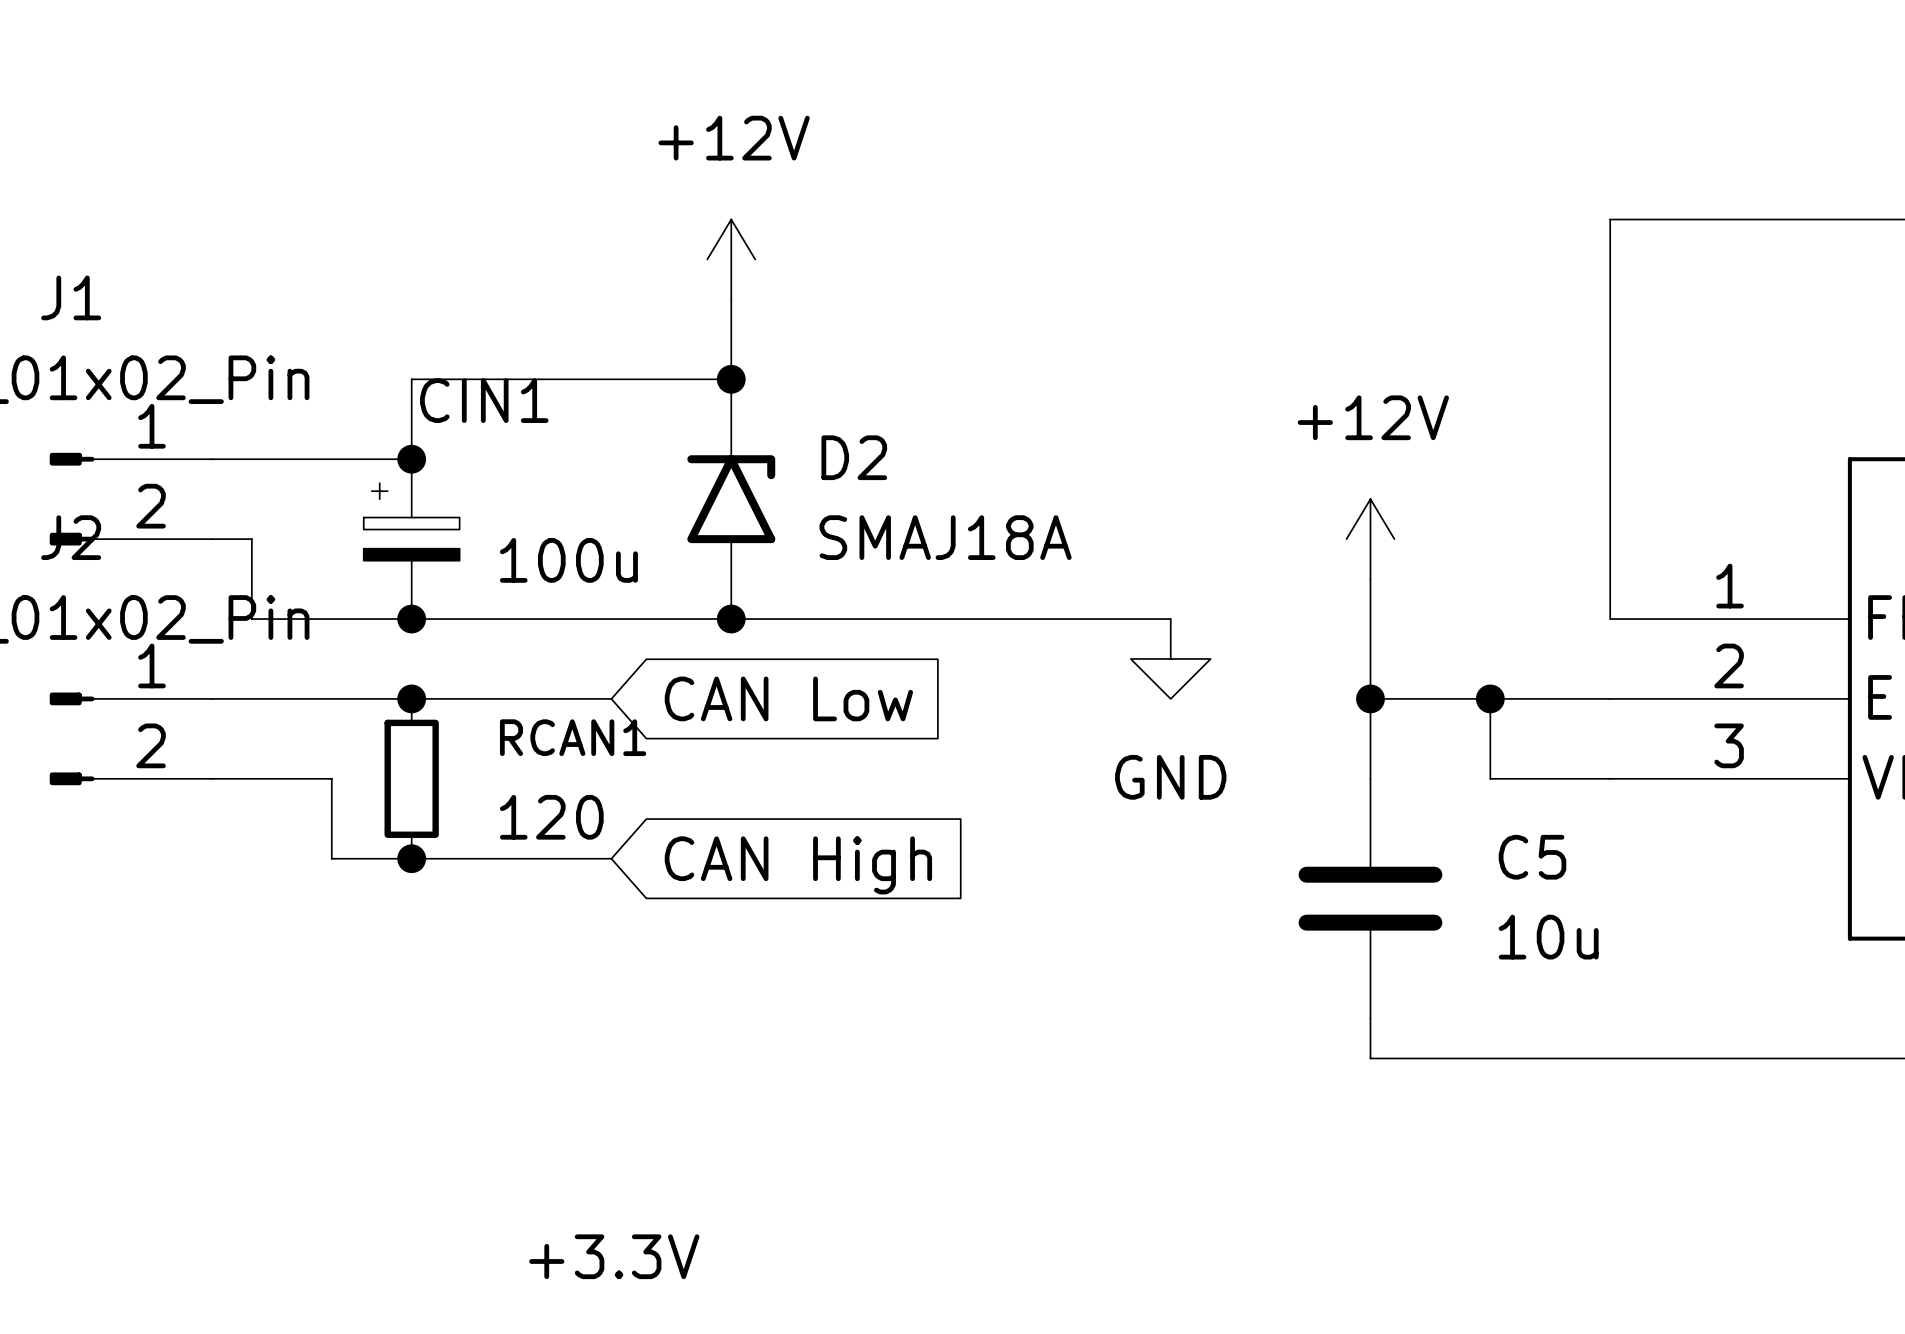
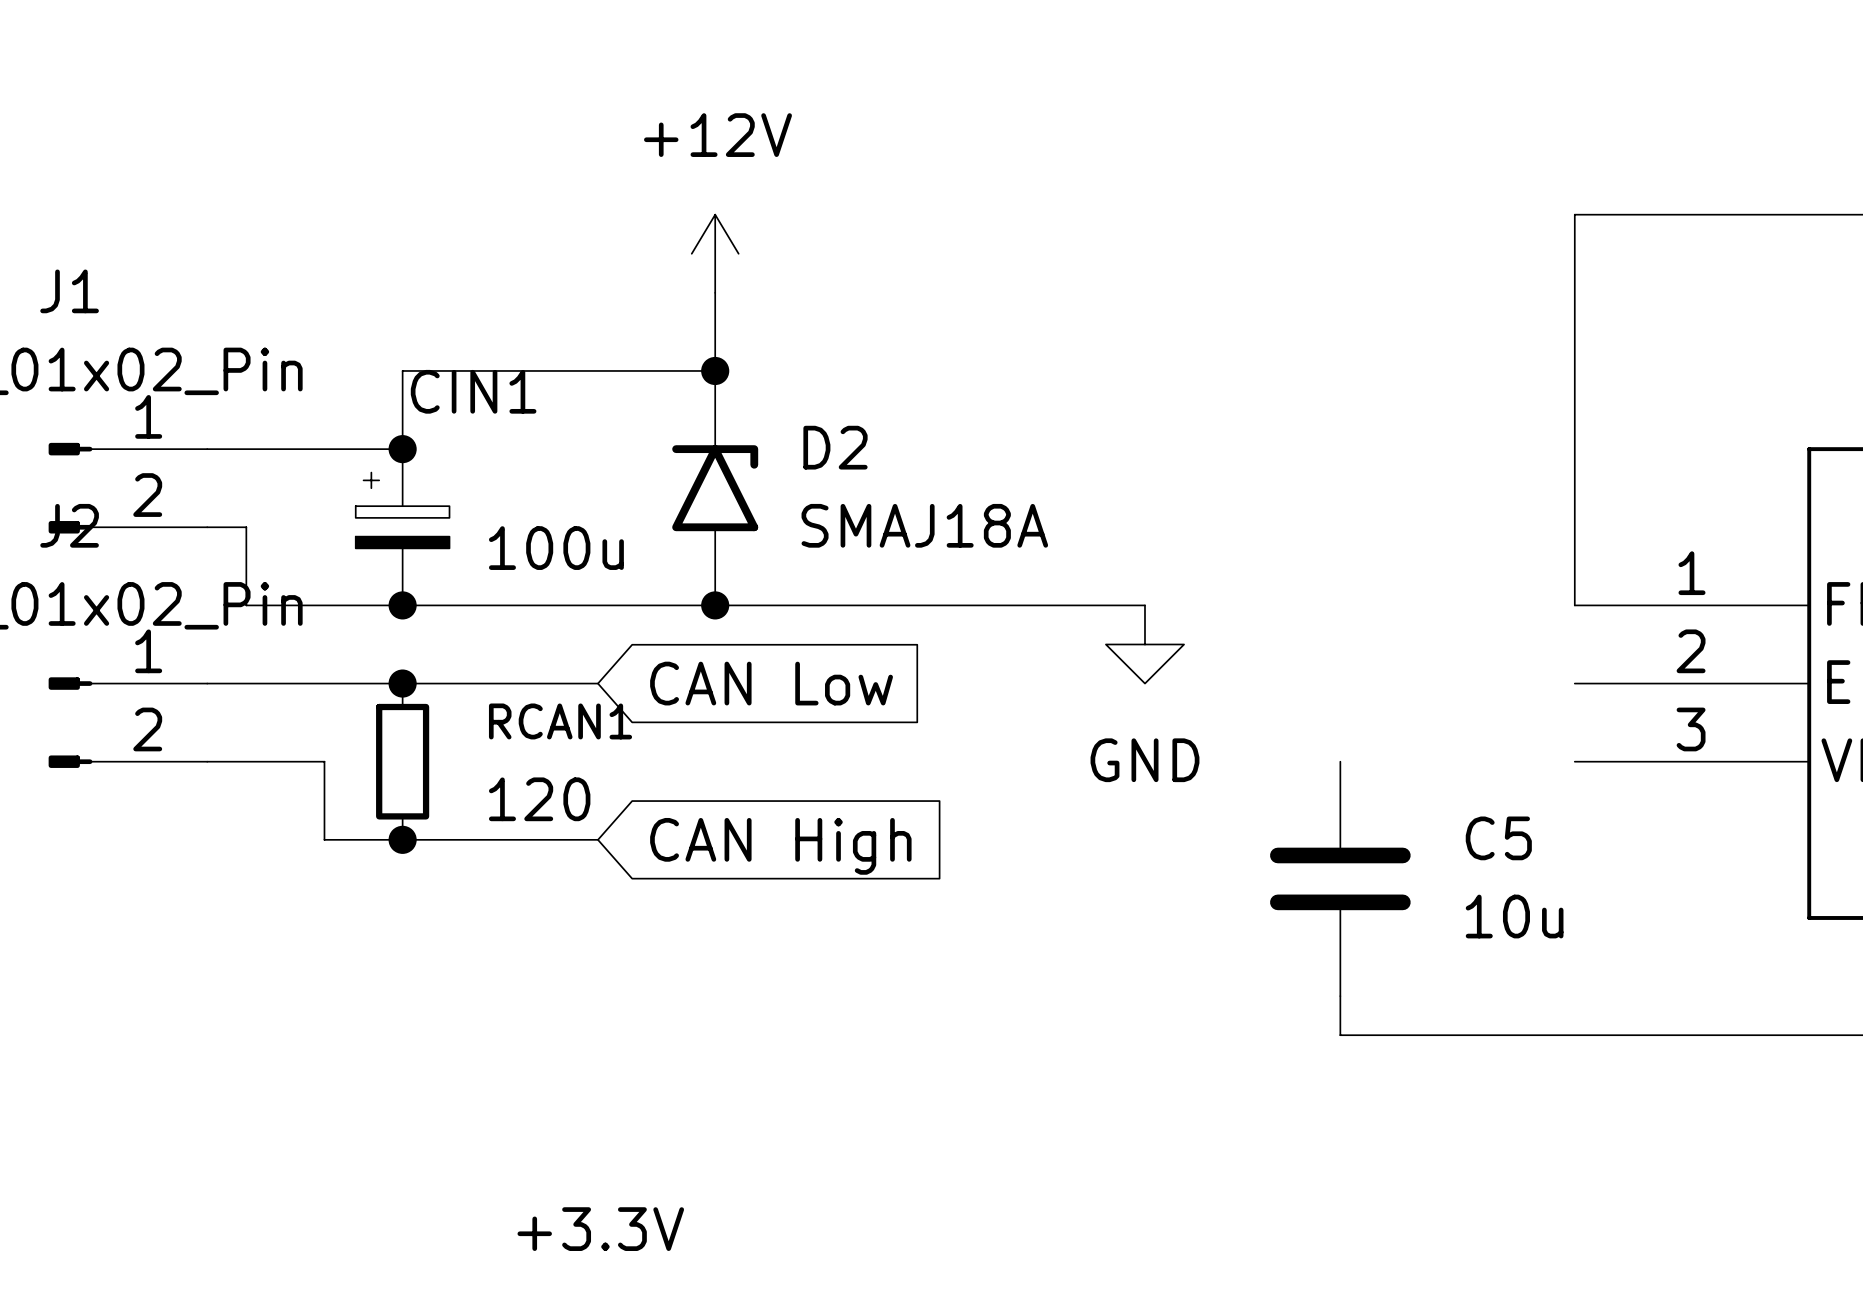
power symbol: +12V (1370, 539) -> none
wire: (1370, 579) (1370, 778) -> none
wire: (1370, 698) (1610, 698) -> none
junction: (1370, 698) -> none
wire: (1490, 698) (1490, 778) (1610, 778) -> none
junction: (1490, 698) -> none

